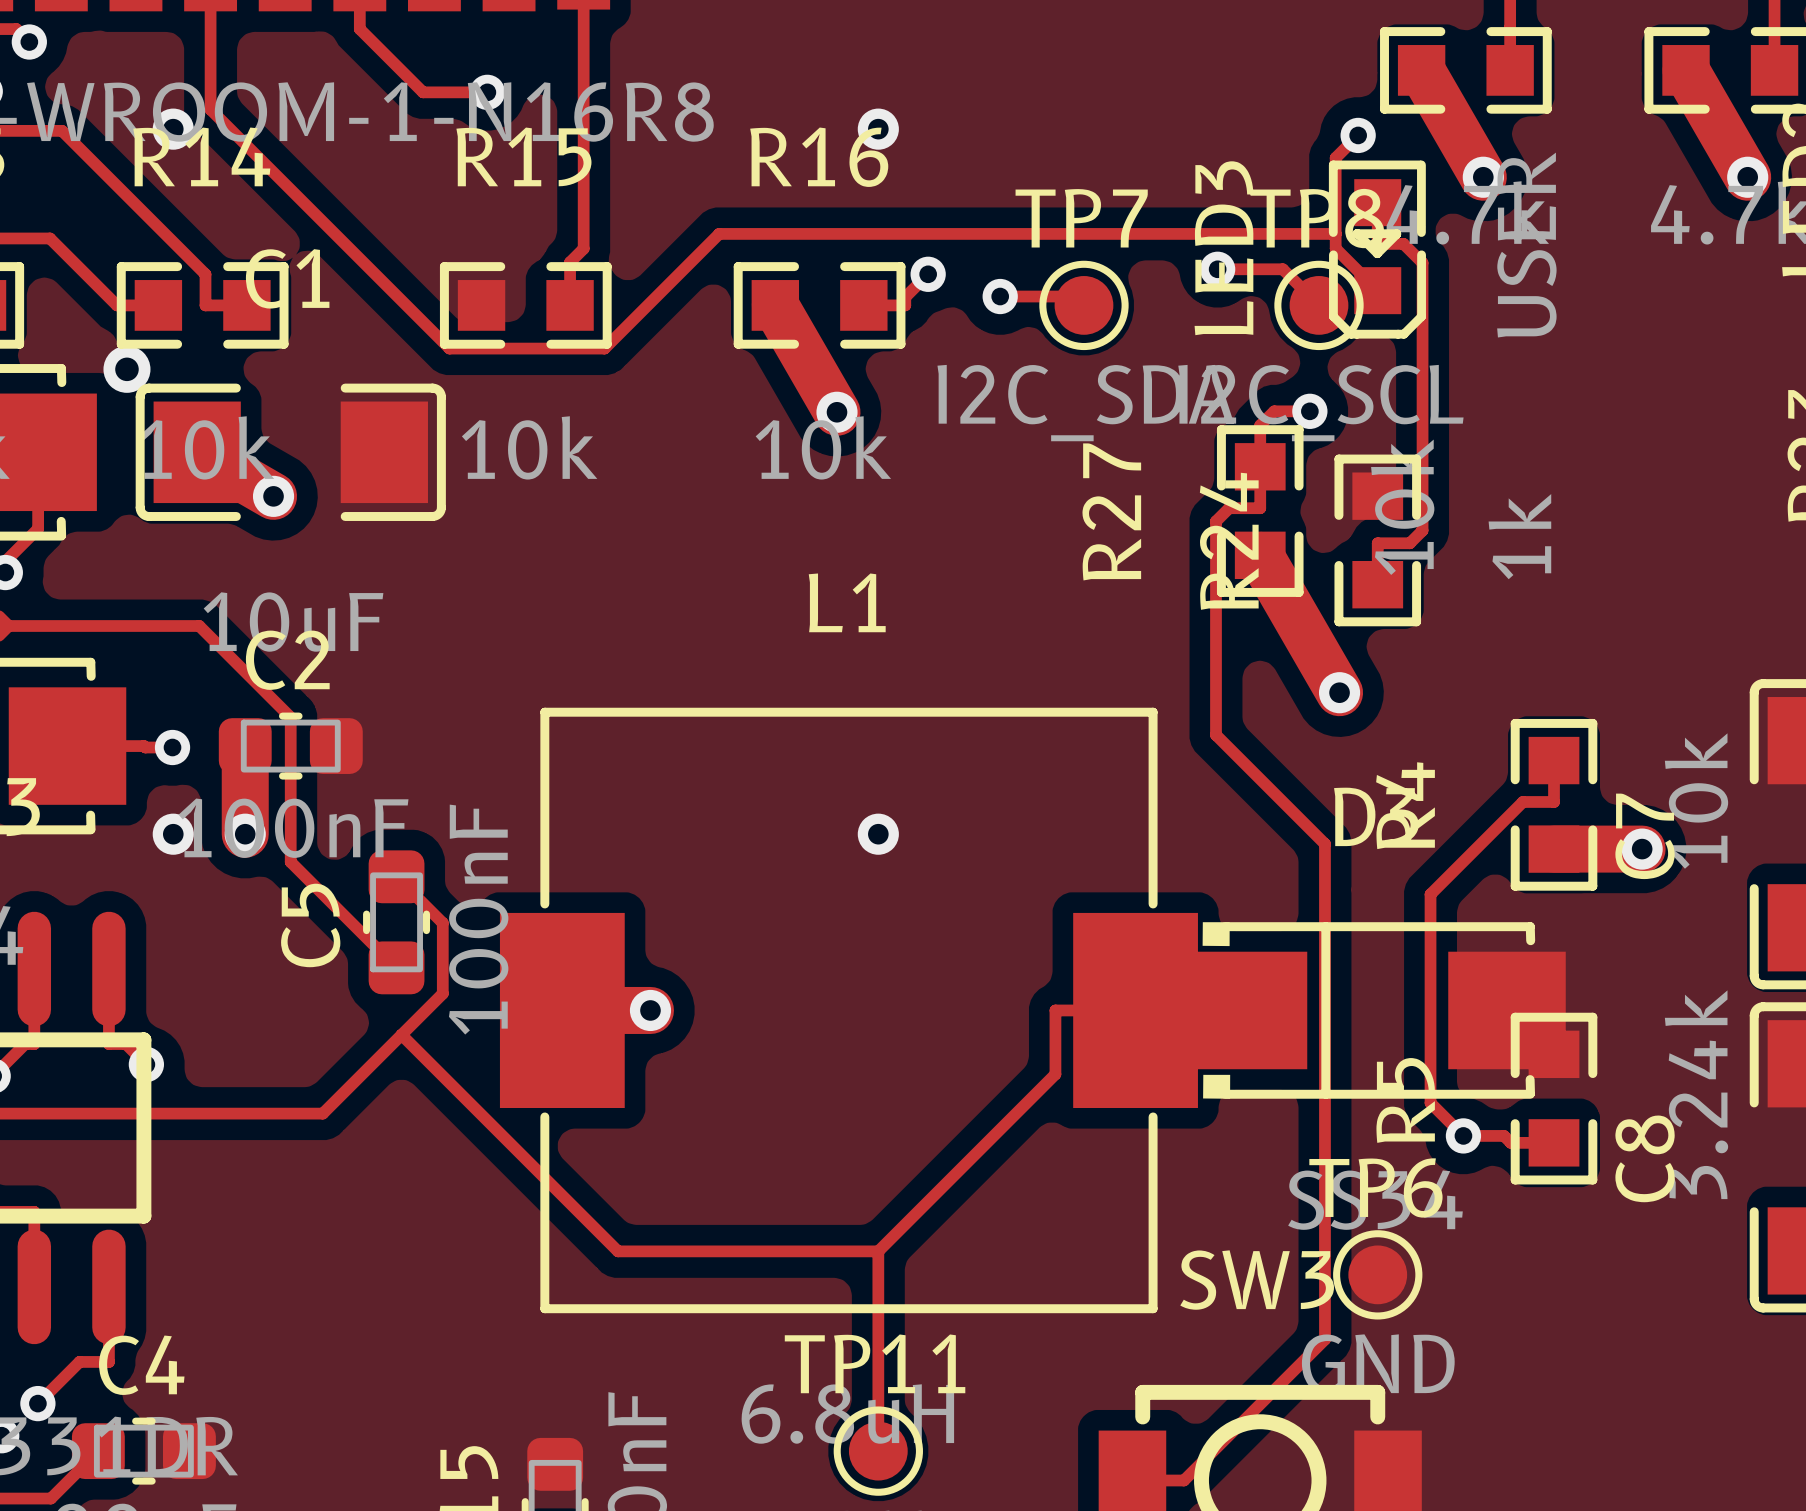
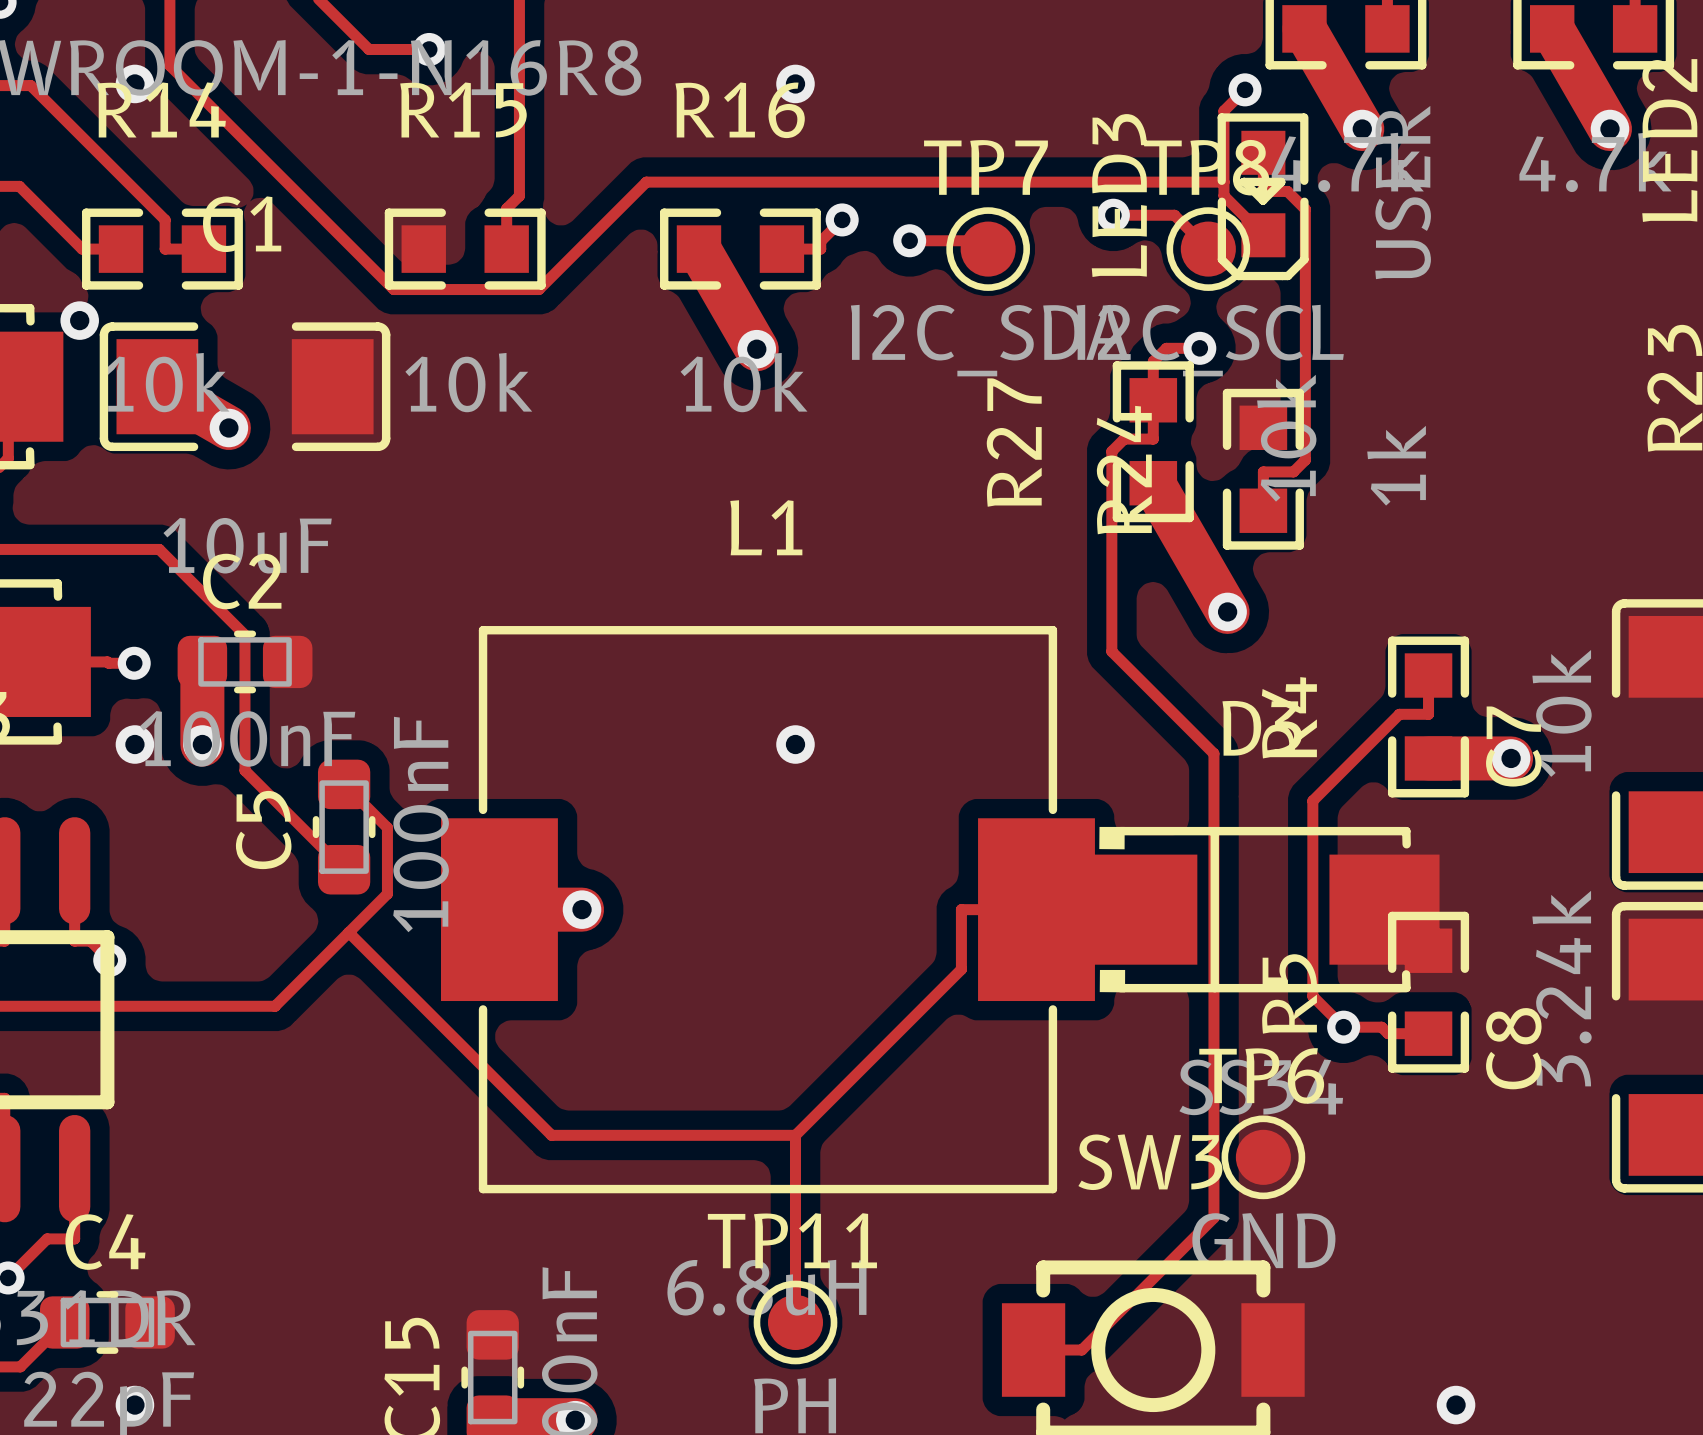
via position: (126, 369) -> (79, 320)

